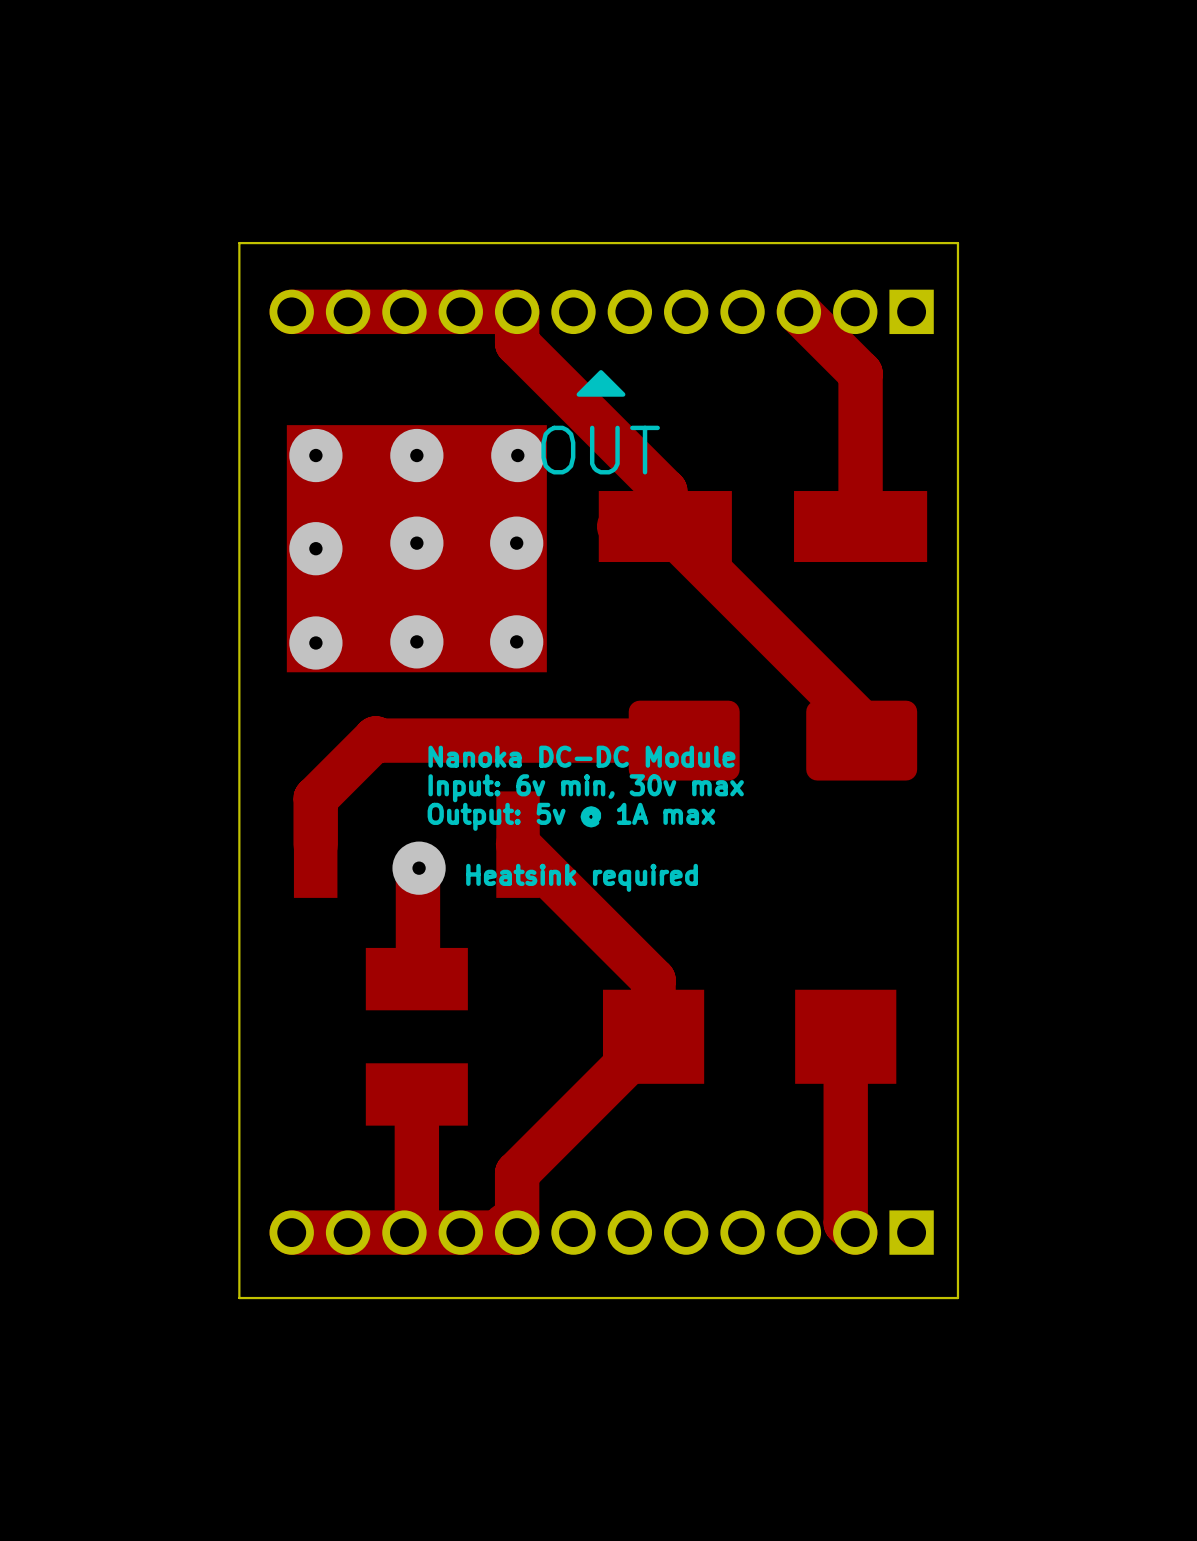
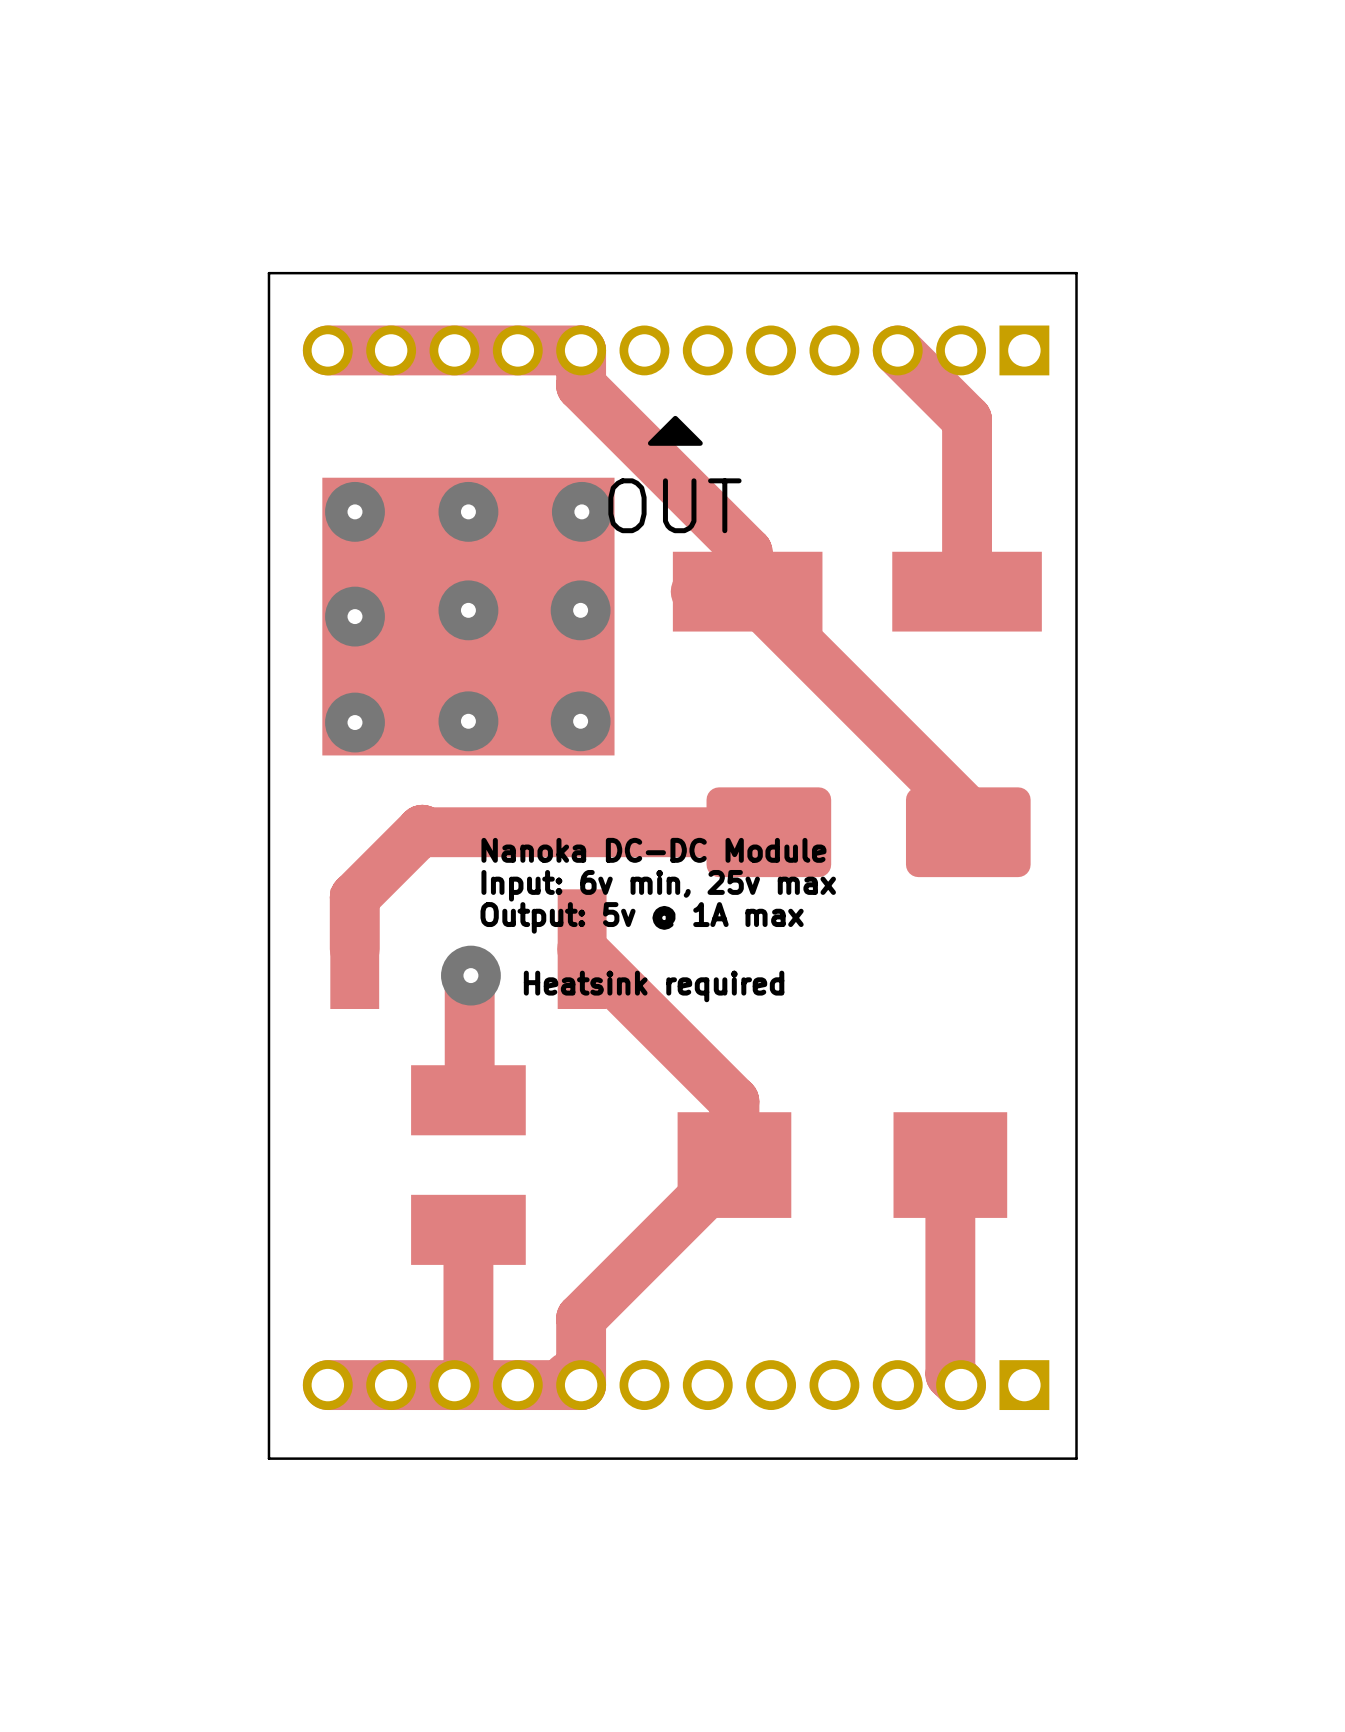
text: Input: 6v min, 30v max (586, 788) -> Input: 6v min, 25v max (658, 885)

